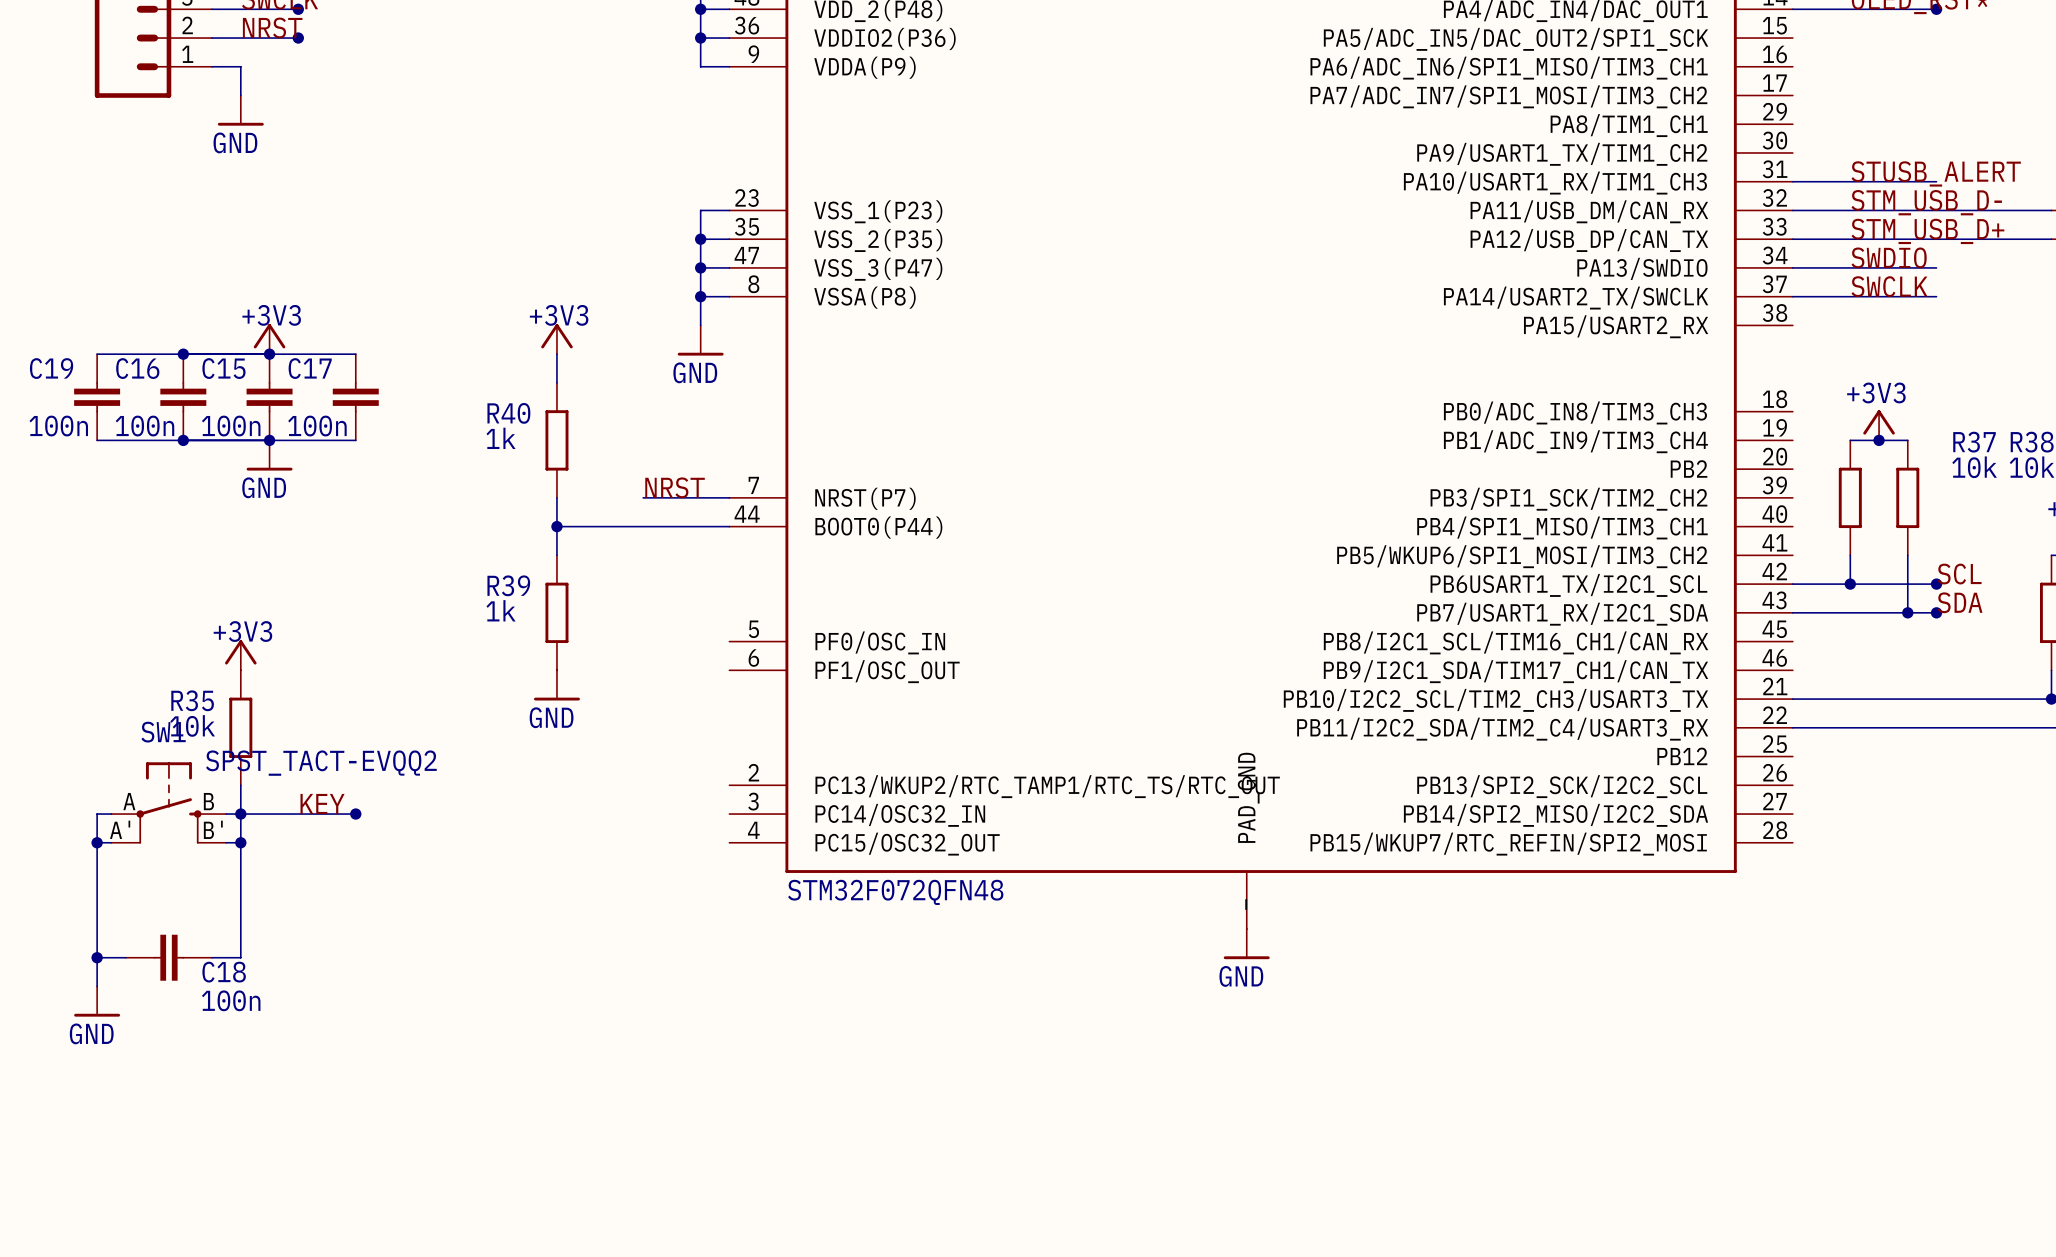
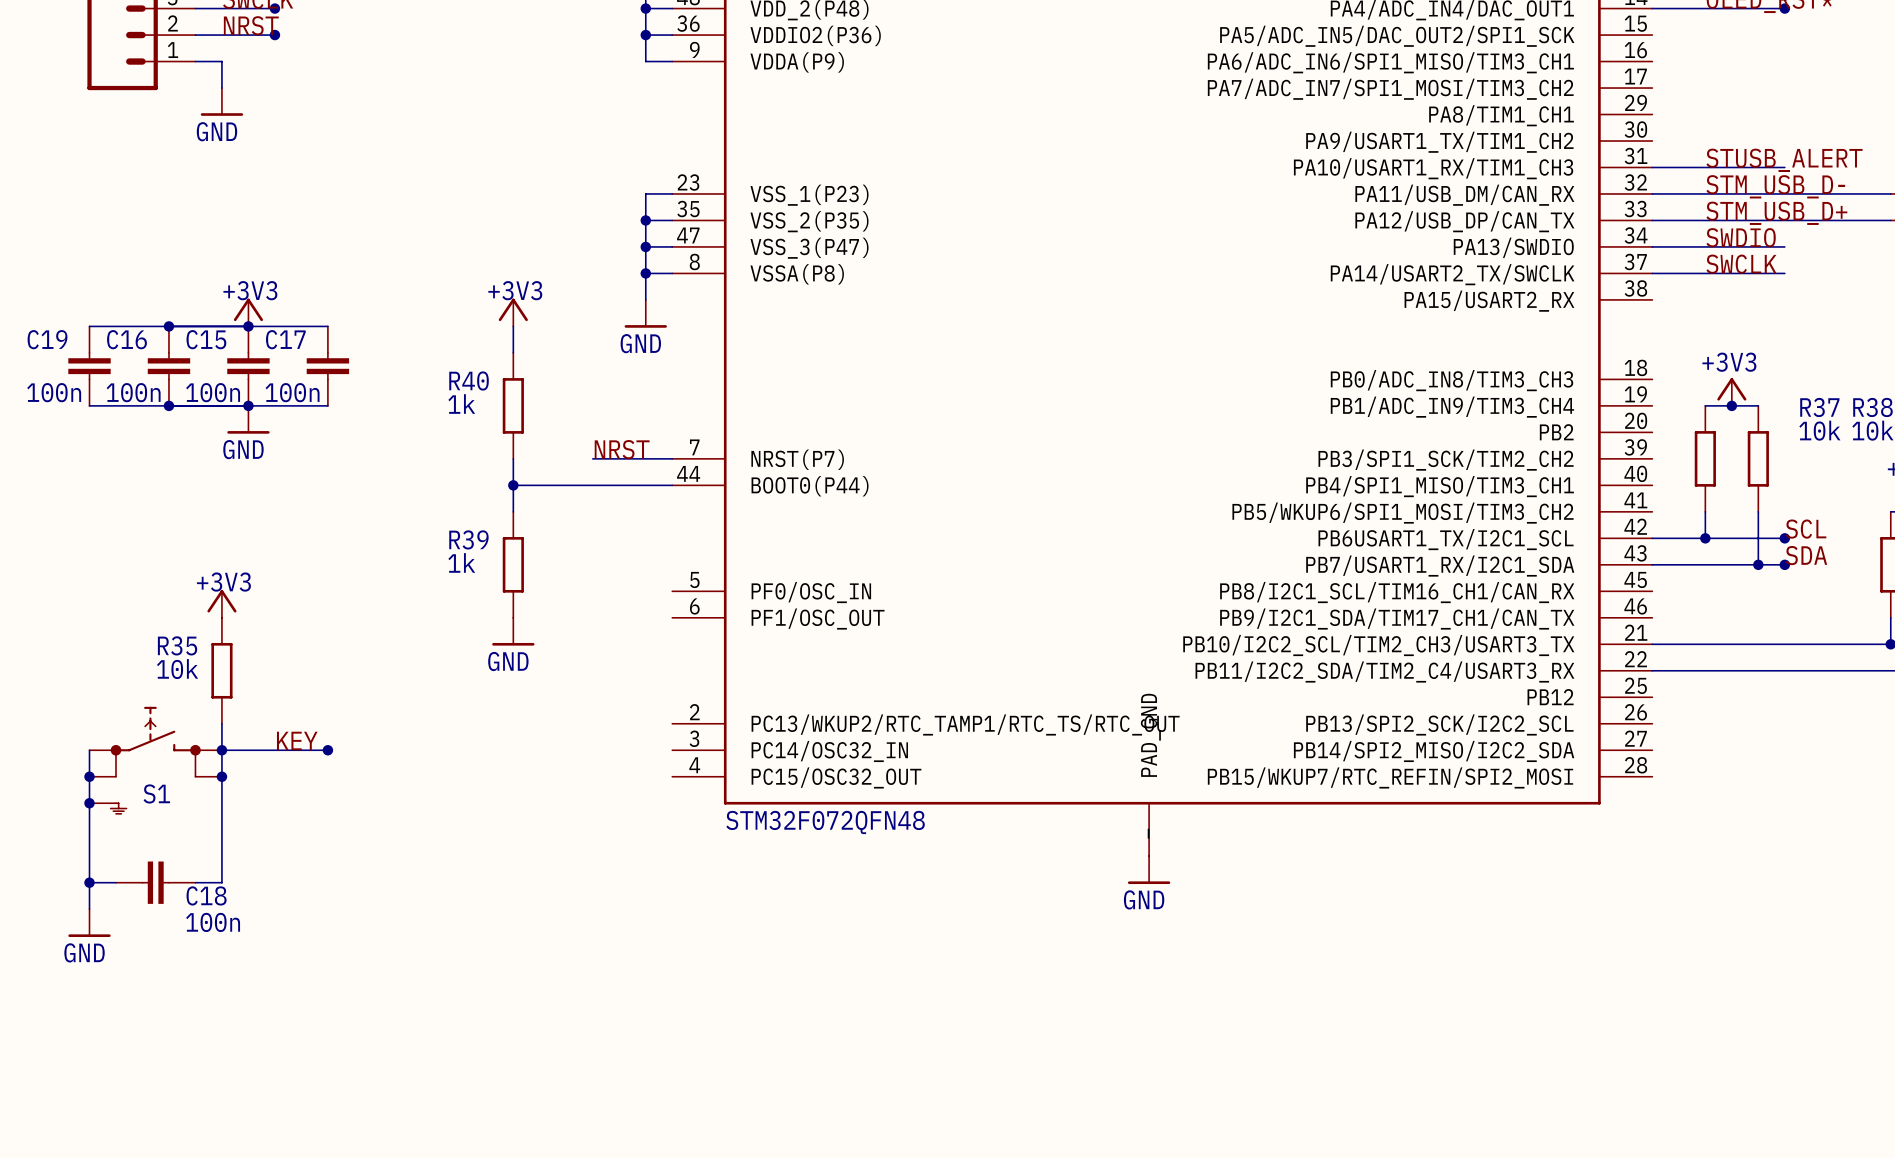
SW1: SPST_TACT-EVQQ2 (168, 802) -> none
S1: none -> (155, 760)
junction: none -> (89, 803)

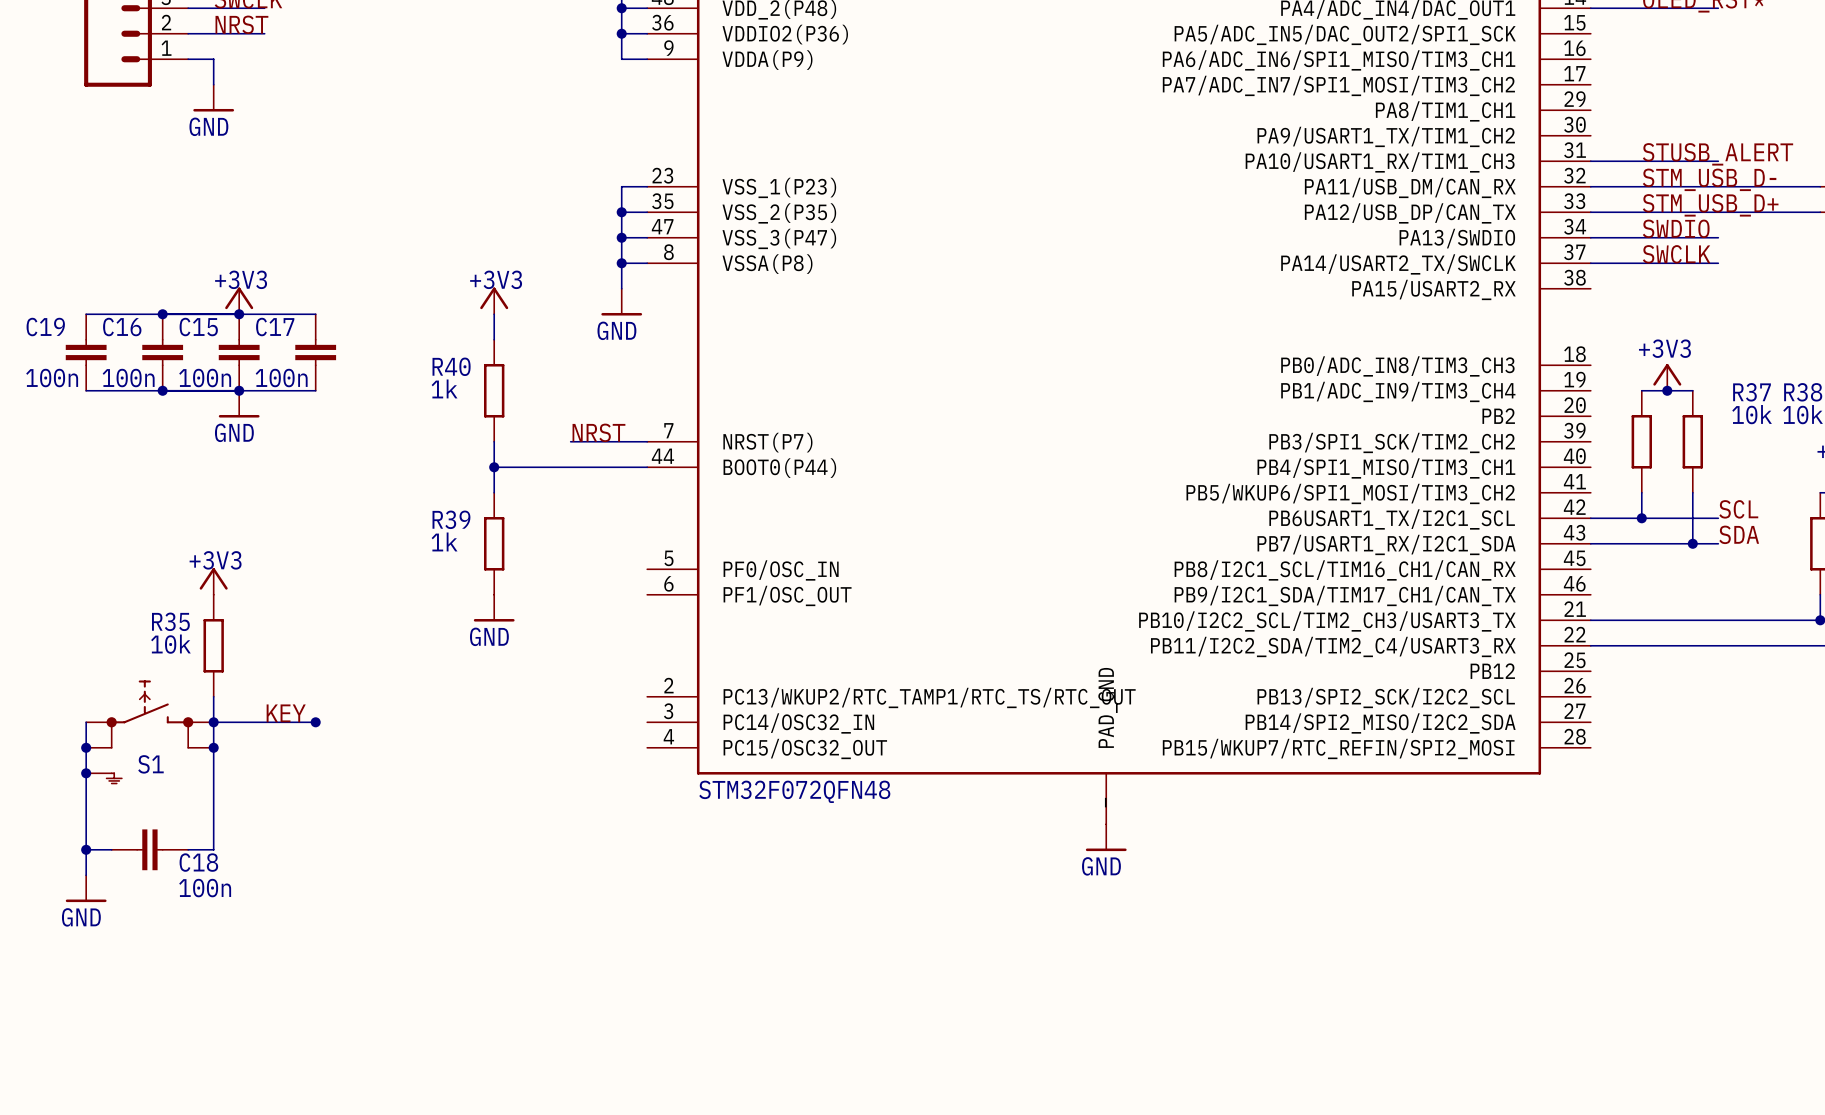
junction: (274, 8) -> none
junction: (1784, 8) -> none
junction: (274, 35) -> none
junction: (1784, 538) -> none
junction: (1784, 564) -> none

